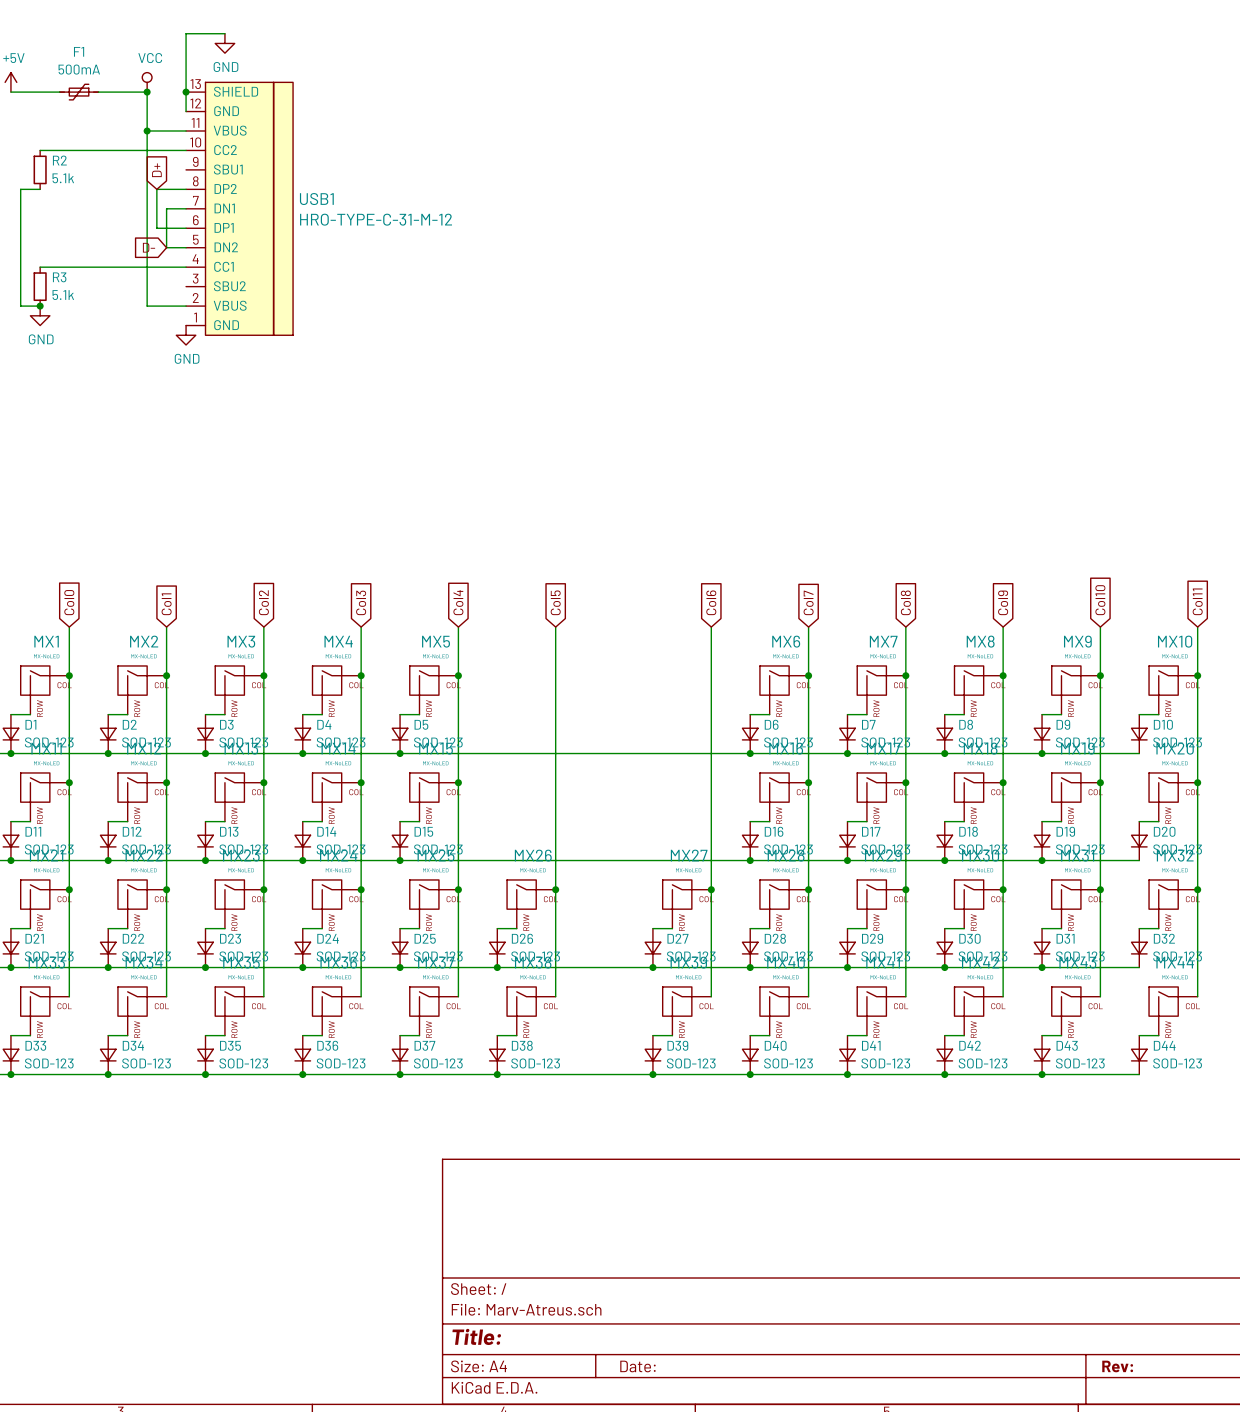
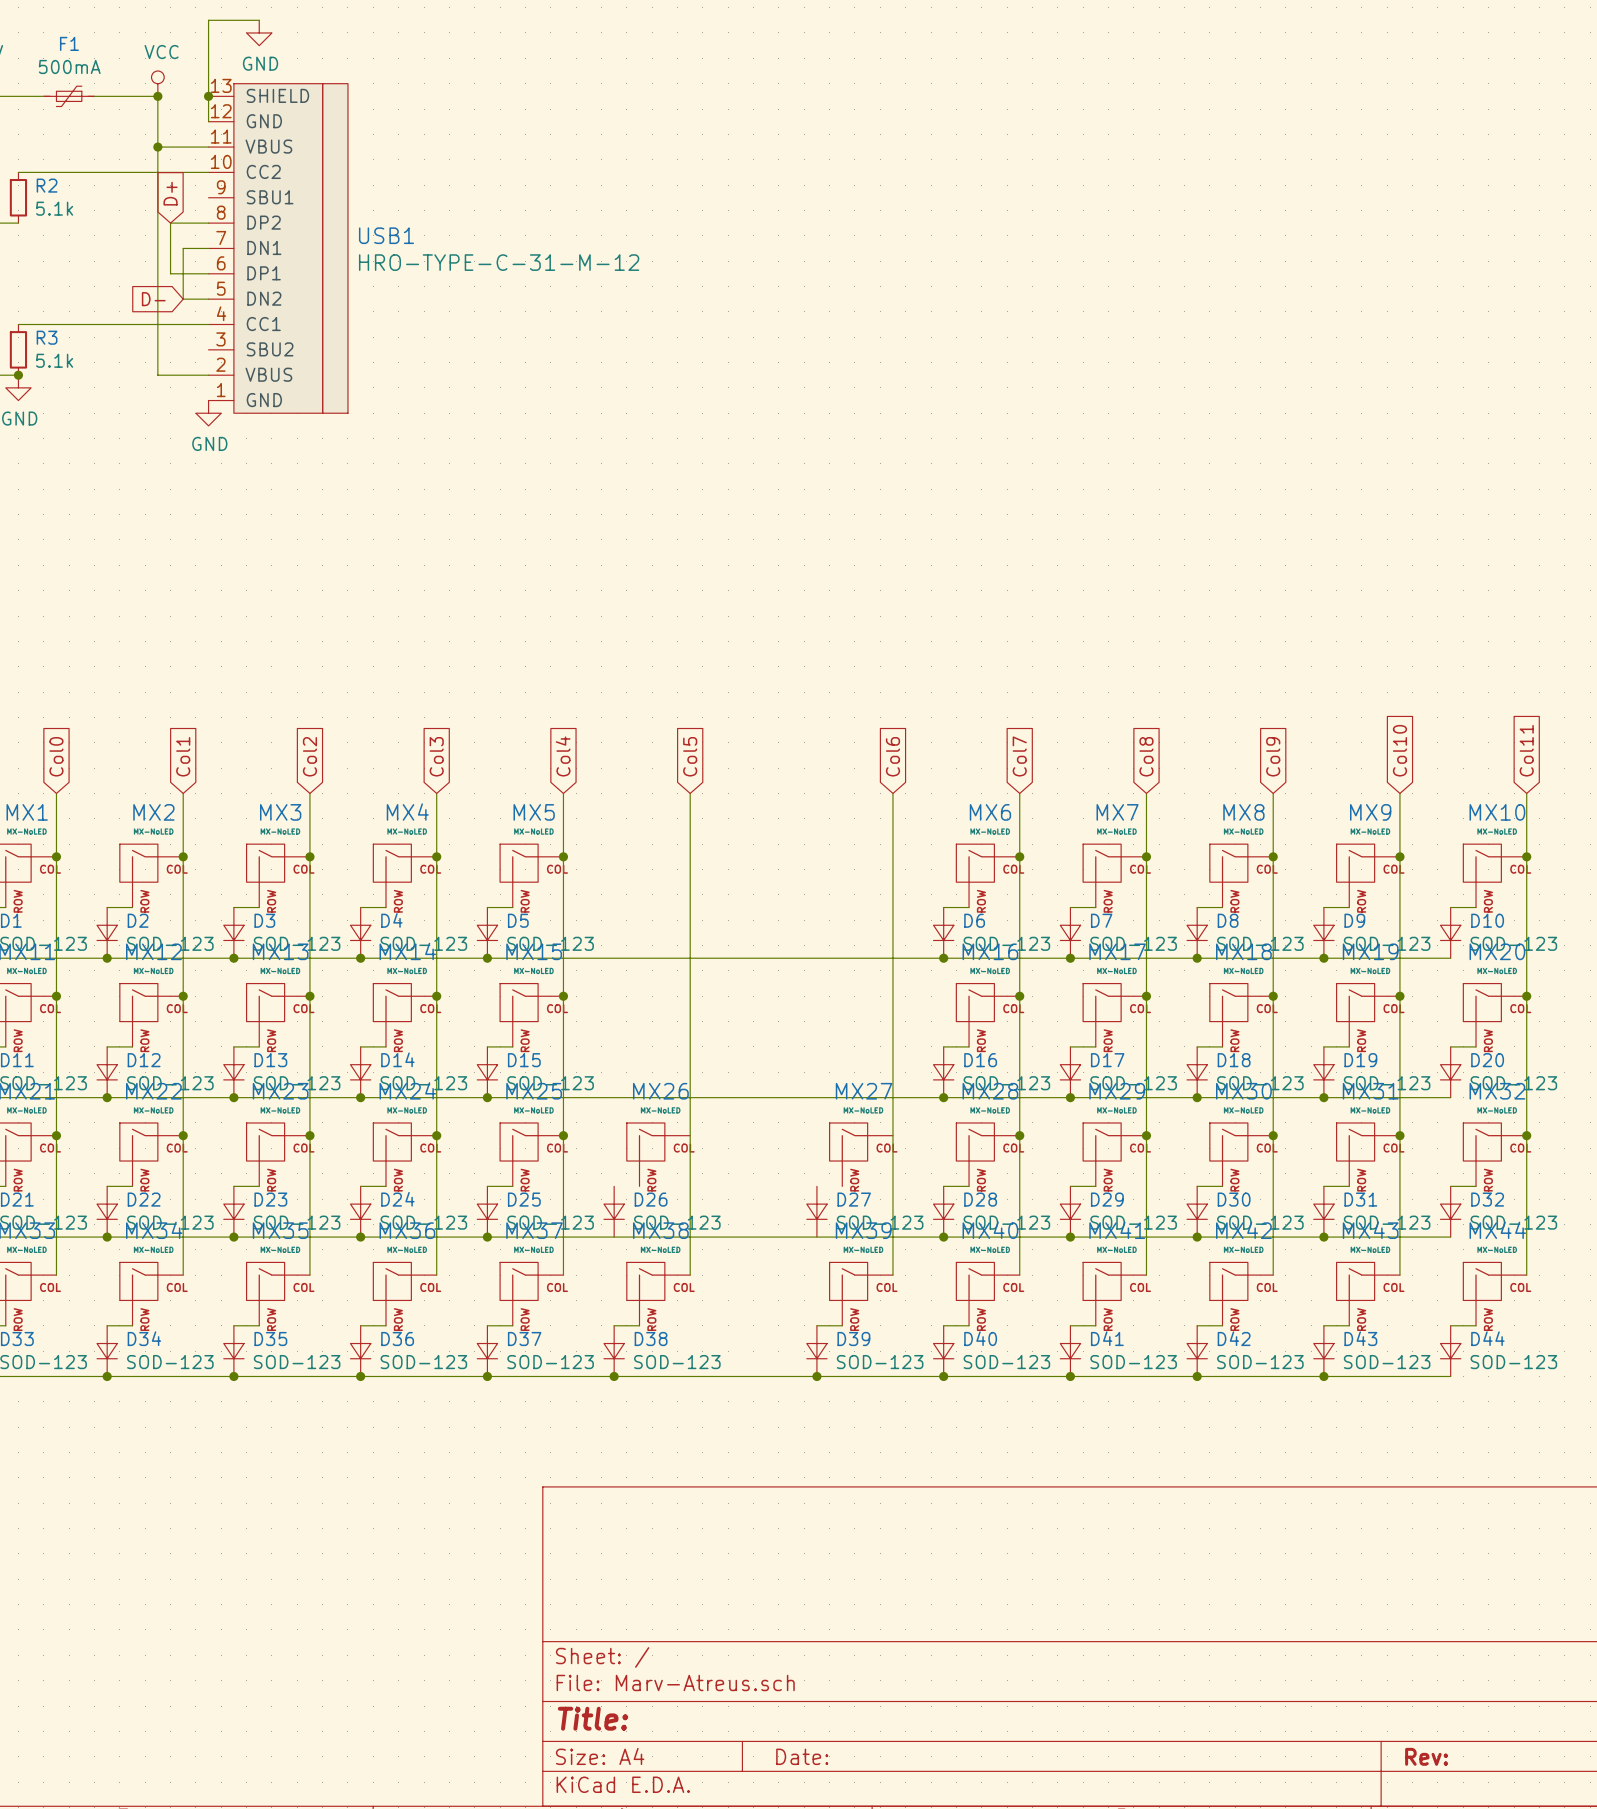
junction: (555, 889) -> none
junction: (711, 889) -> none
wire: (497, 928) (516, 928) -> none
wire: (652, 928) (672, 928) -> none
junction: (497, 967) -> none
junction: (652, 967) -> none

